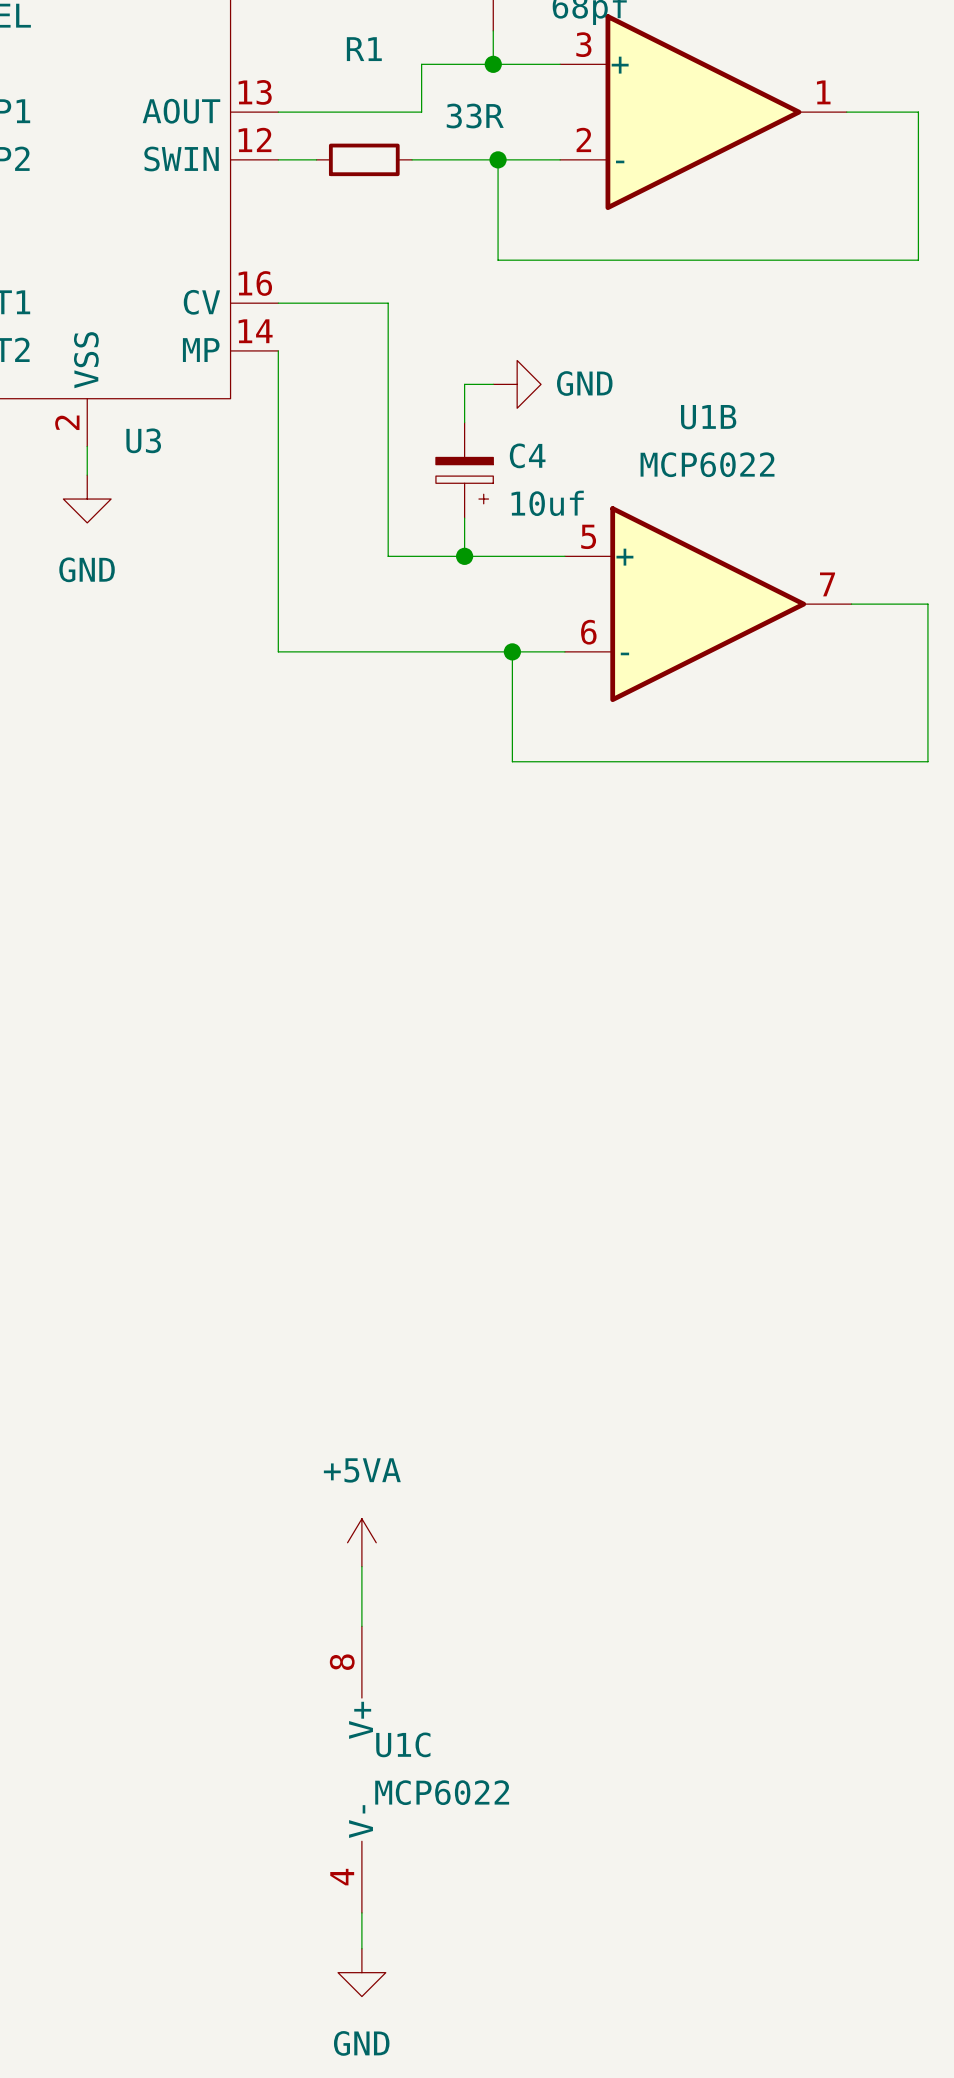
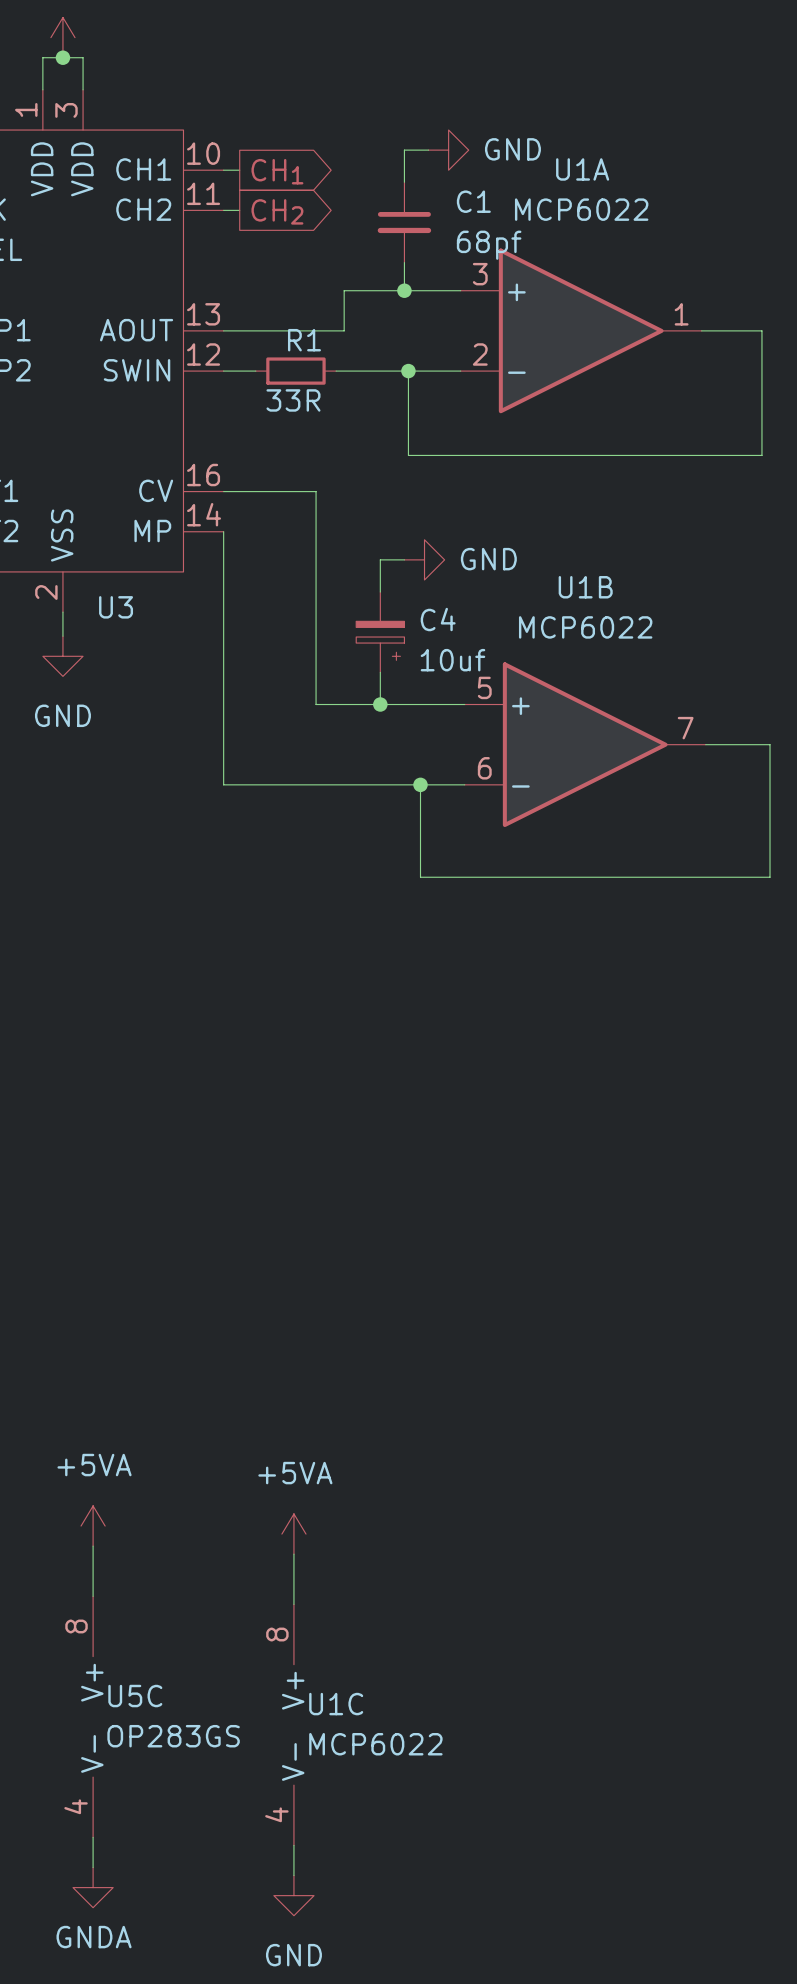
R1 name position: R1 (364, 49) -> R1 (304, 340)
R1 value position: 33R (475, 116) -> 33R (293, 400)
power symbol: none -> +5VA (93, 1526)
wire: none -> (93, 1546) (93, 1596)
U5C: none -> OP283GS (93, 1716)
wire: none -> (93, 1837) (93, 1867)
power symbol: none -> GNDA (93, 1887)

